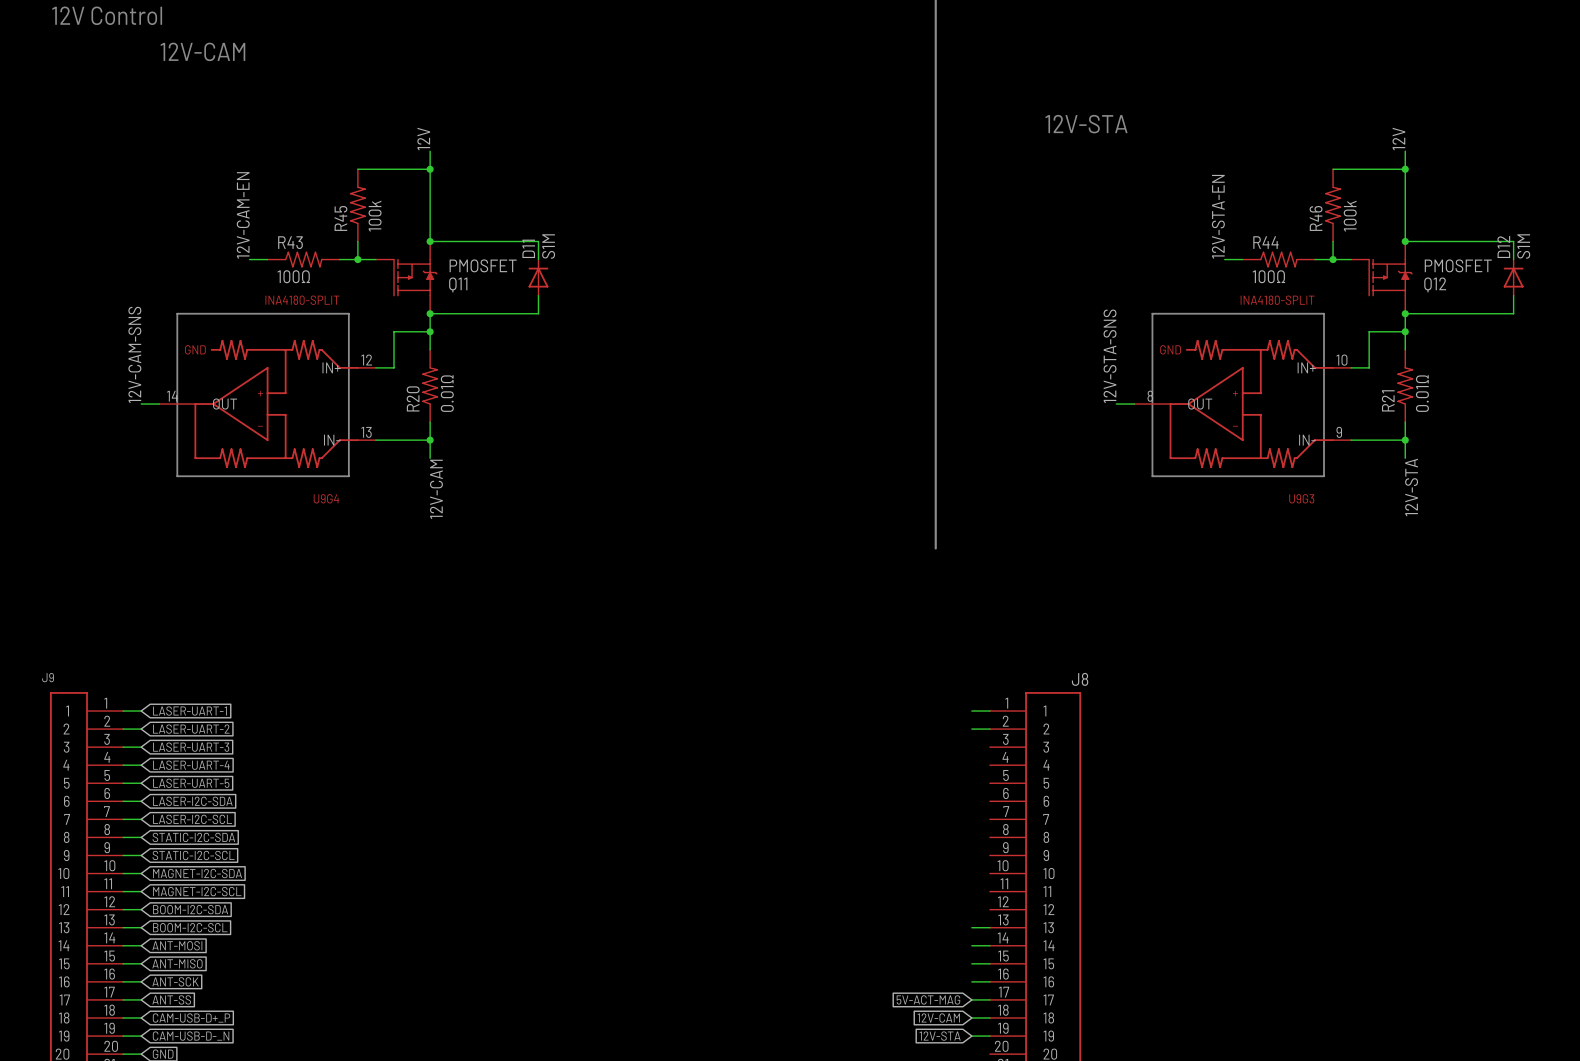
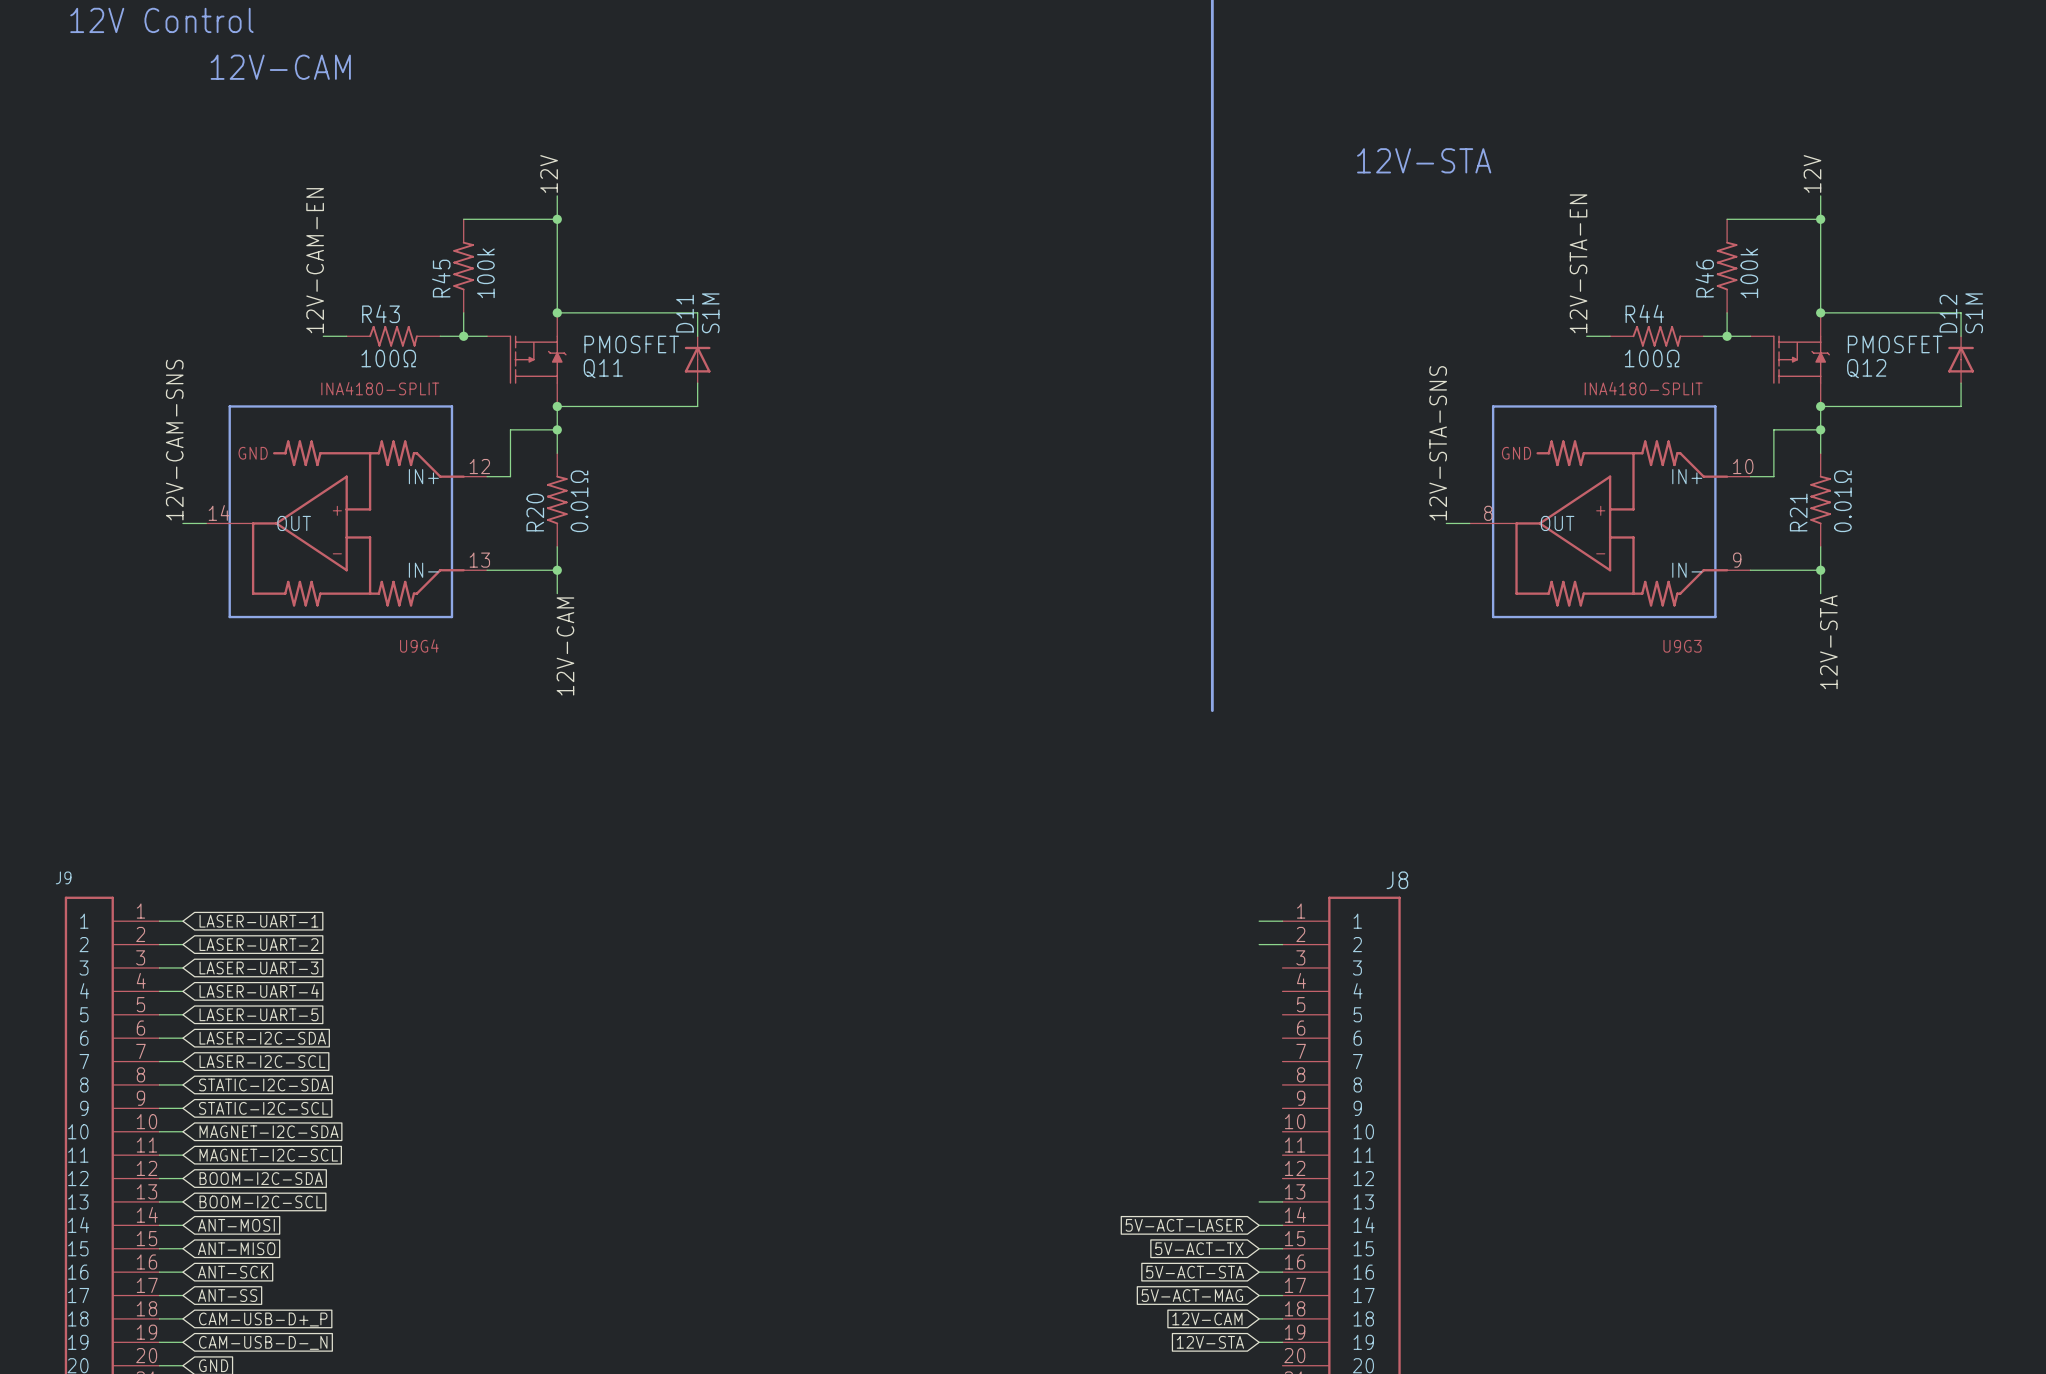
global label: none -> 5V-ACT-LASER (1184, 1225)
global label: none -> 5V-ACT-TX (1199, 1248)
global label: none -> 5V-ACT-STA (1195, 1272)

